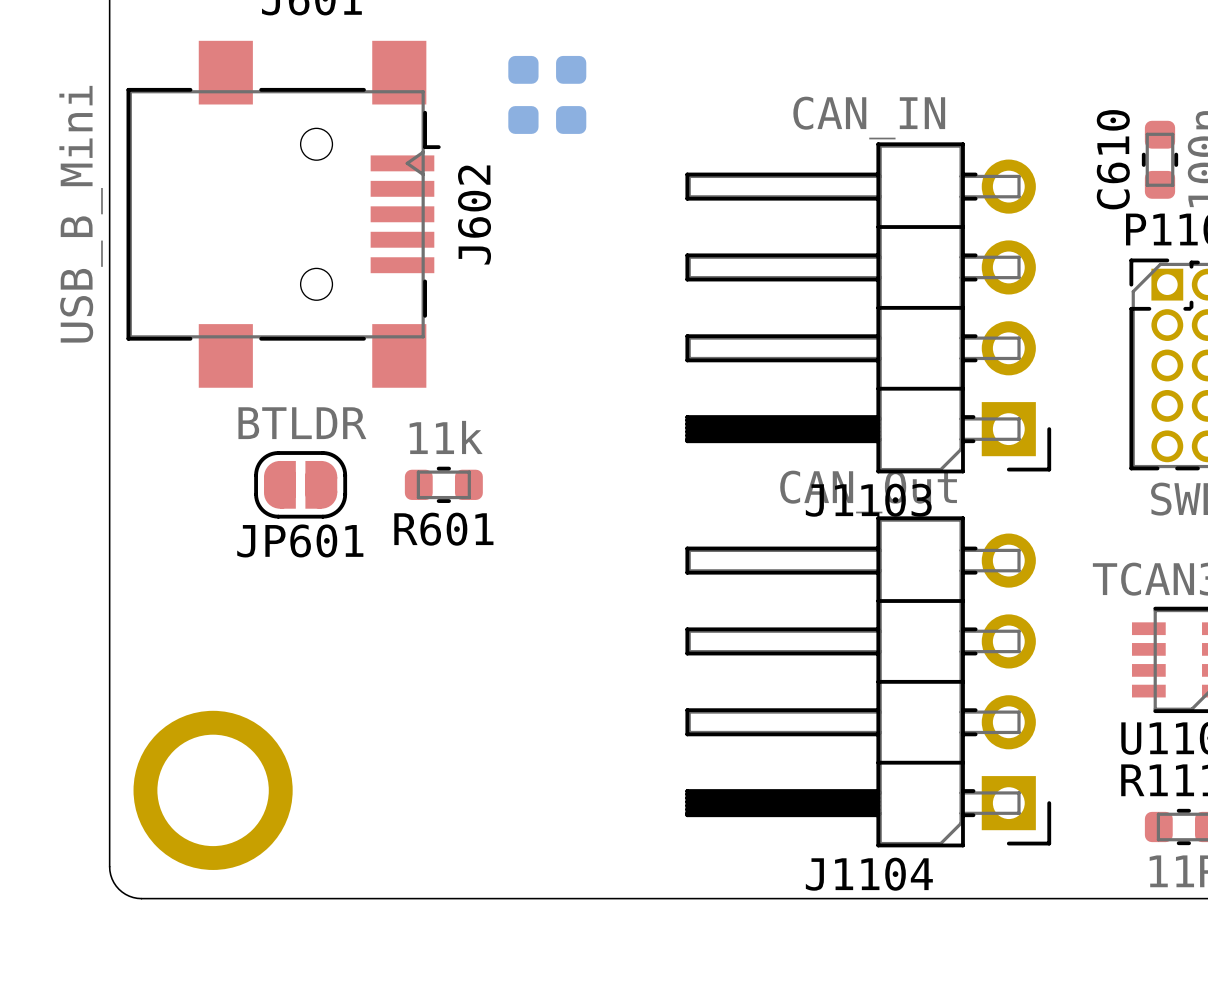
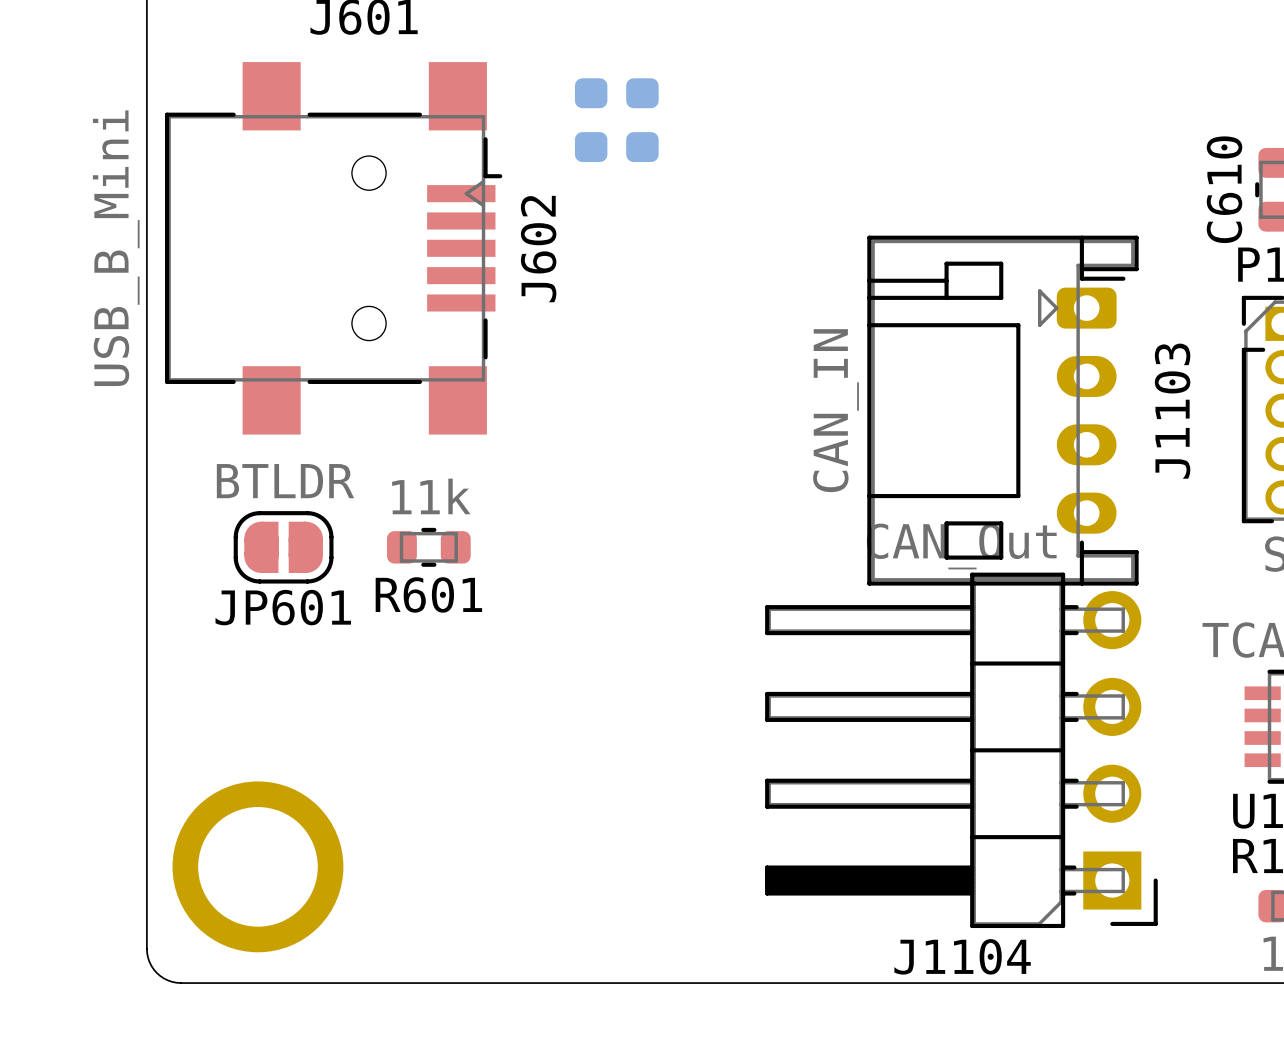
J1103 value position: CAN_IN (869, 118) -> CAN_IN (836, 410)
J1103 footprint: [685, 142, 1052, 474] -> [867, 235, 1139, 586]
JP601 position: (300, 484) -> (283, 547)
R601 position: (443, 484) -> (428, 547)
J1103 name position: J1103 (868, 500) -> J1103 (1172, 411)

